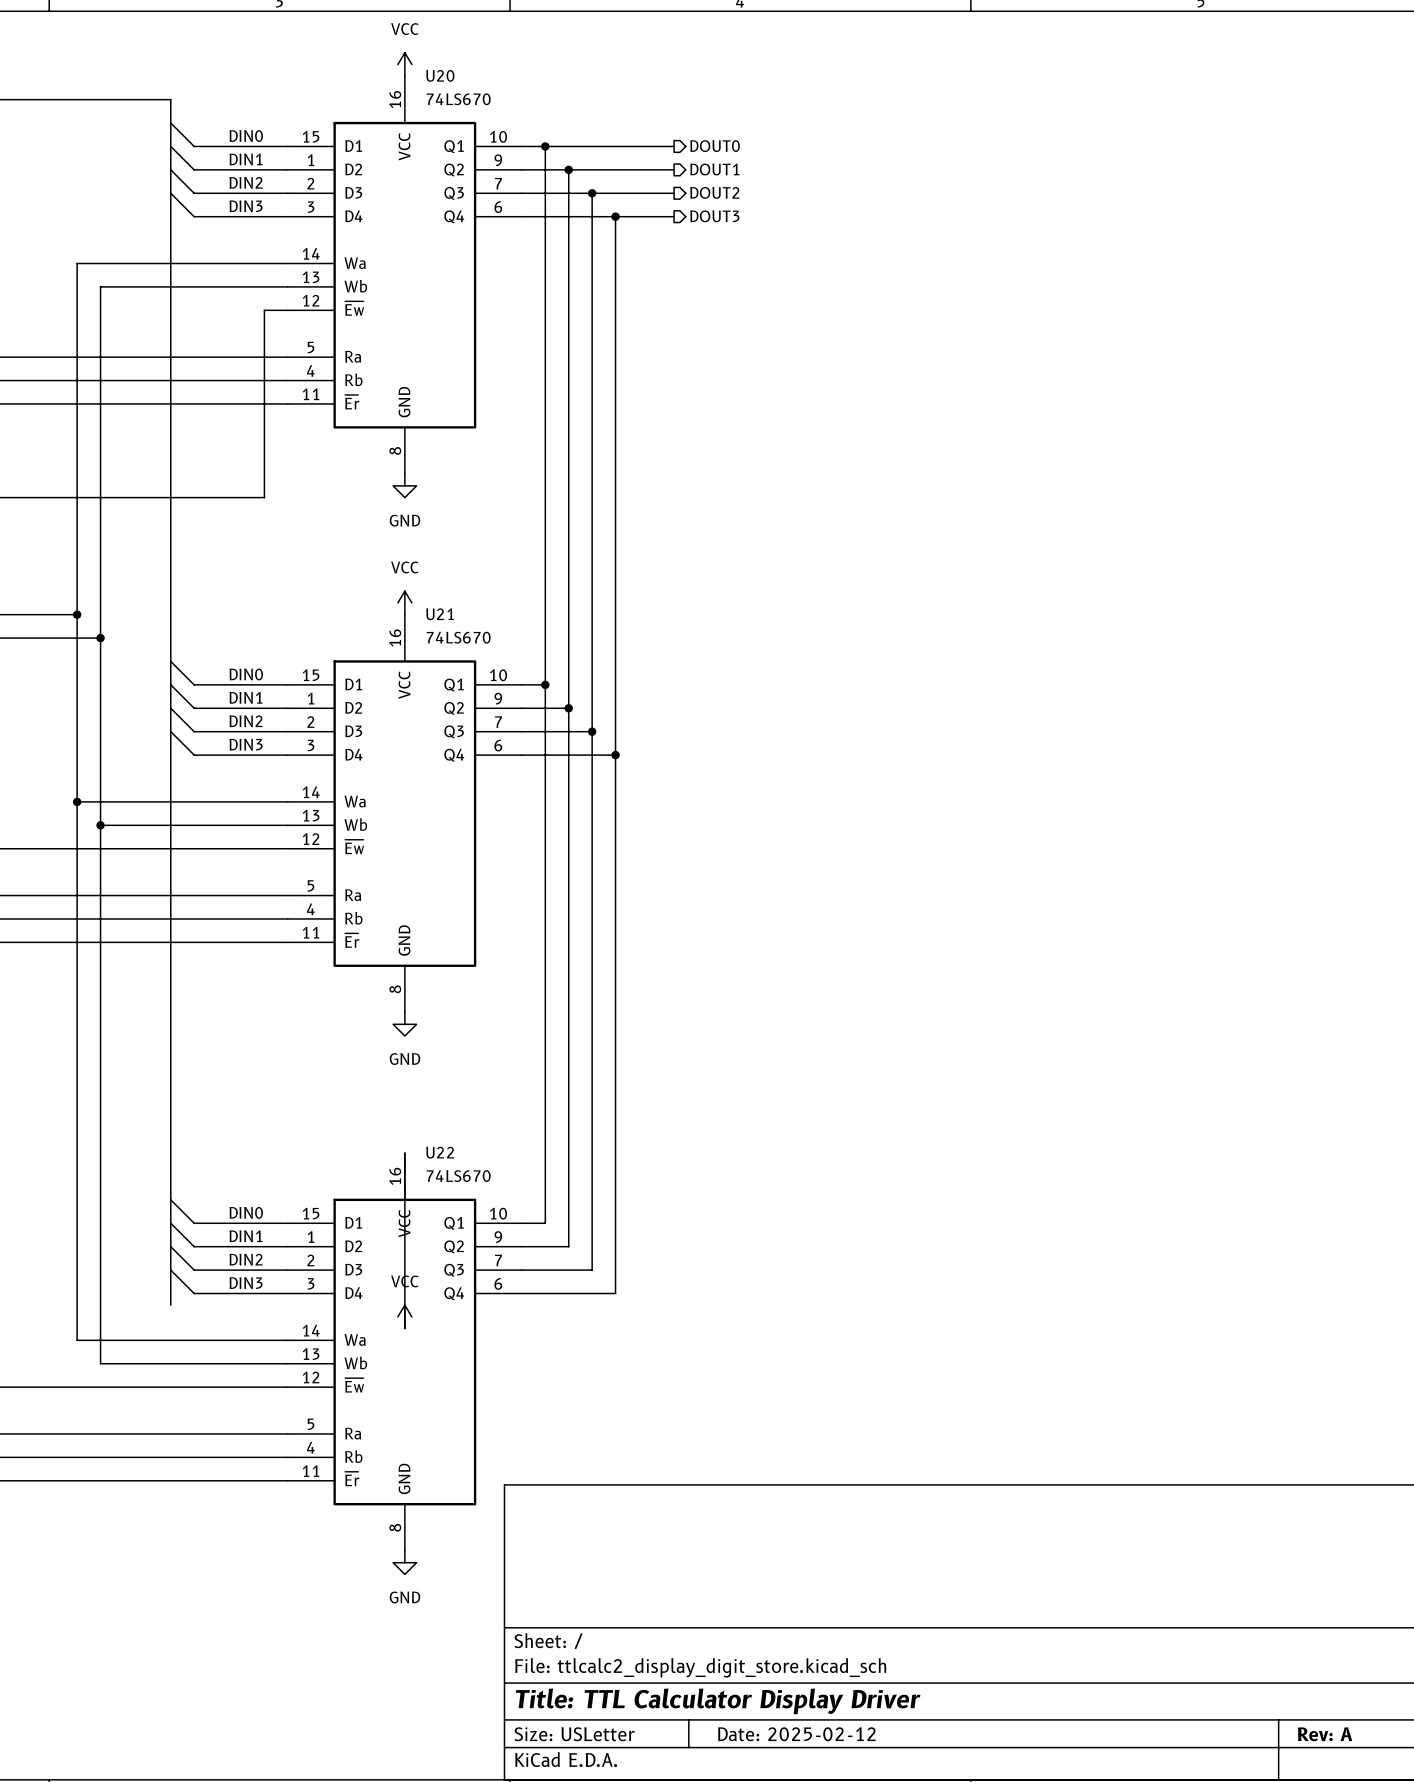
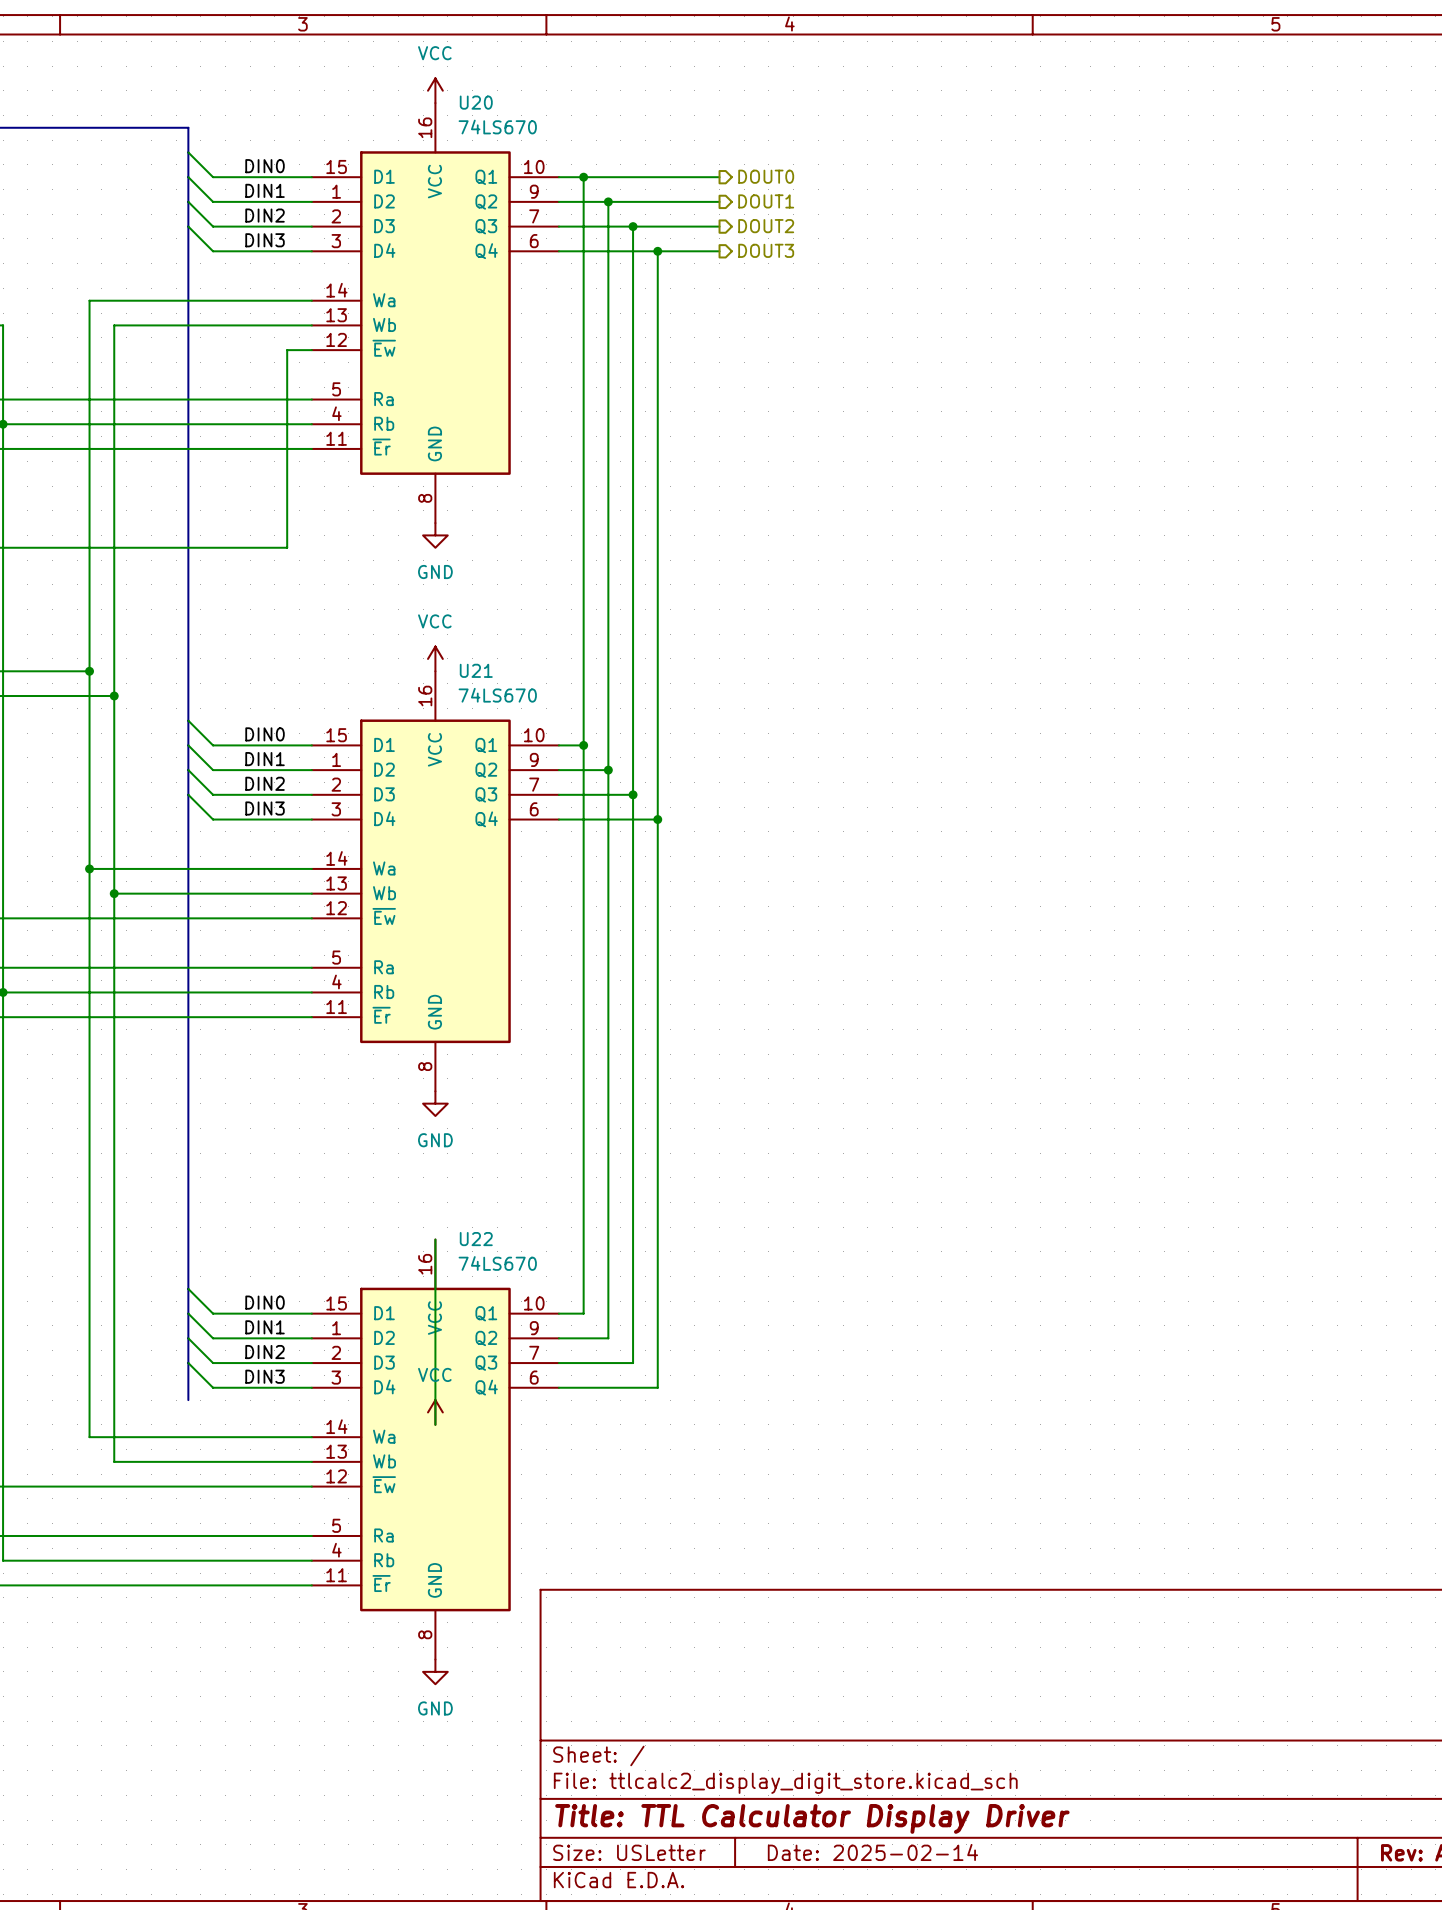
title block: Date: 2025-02-12 (796, 1734) -> Date: 2025-02-14 (872, 1852)

